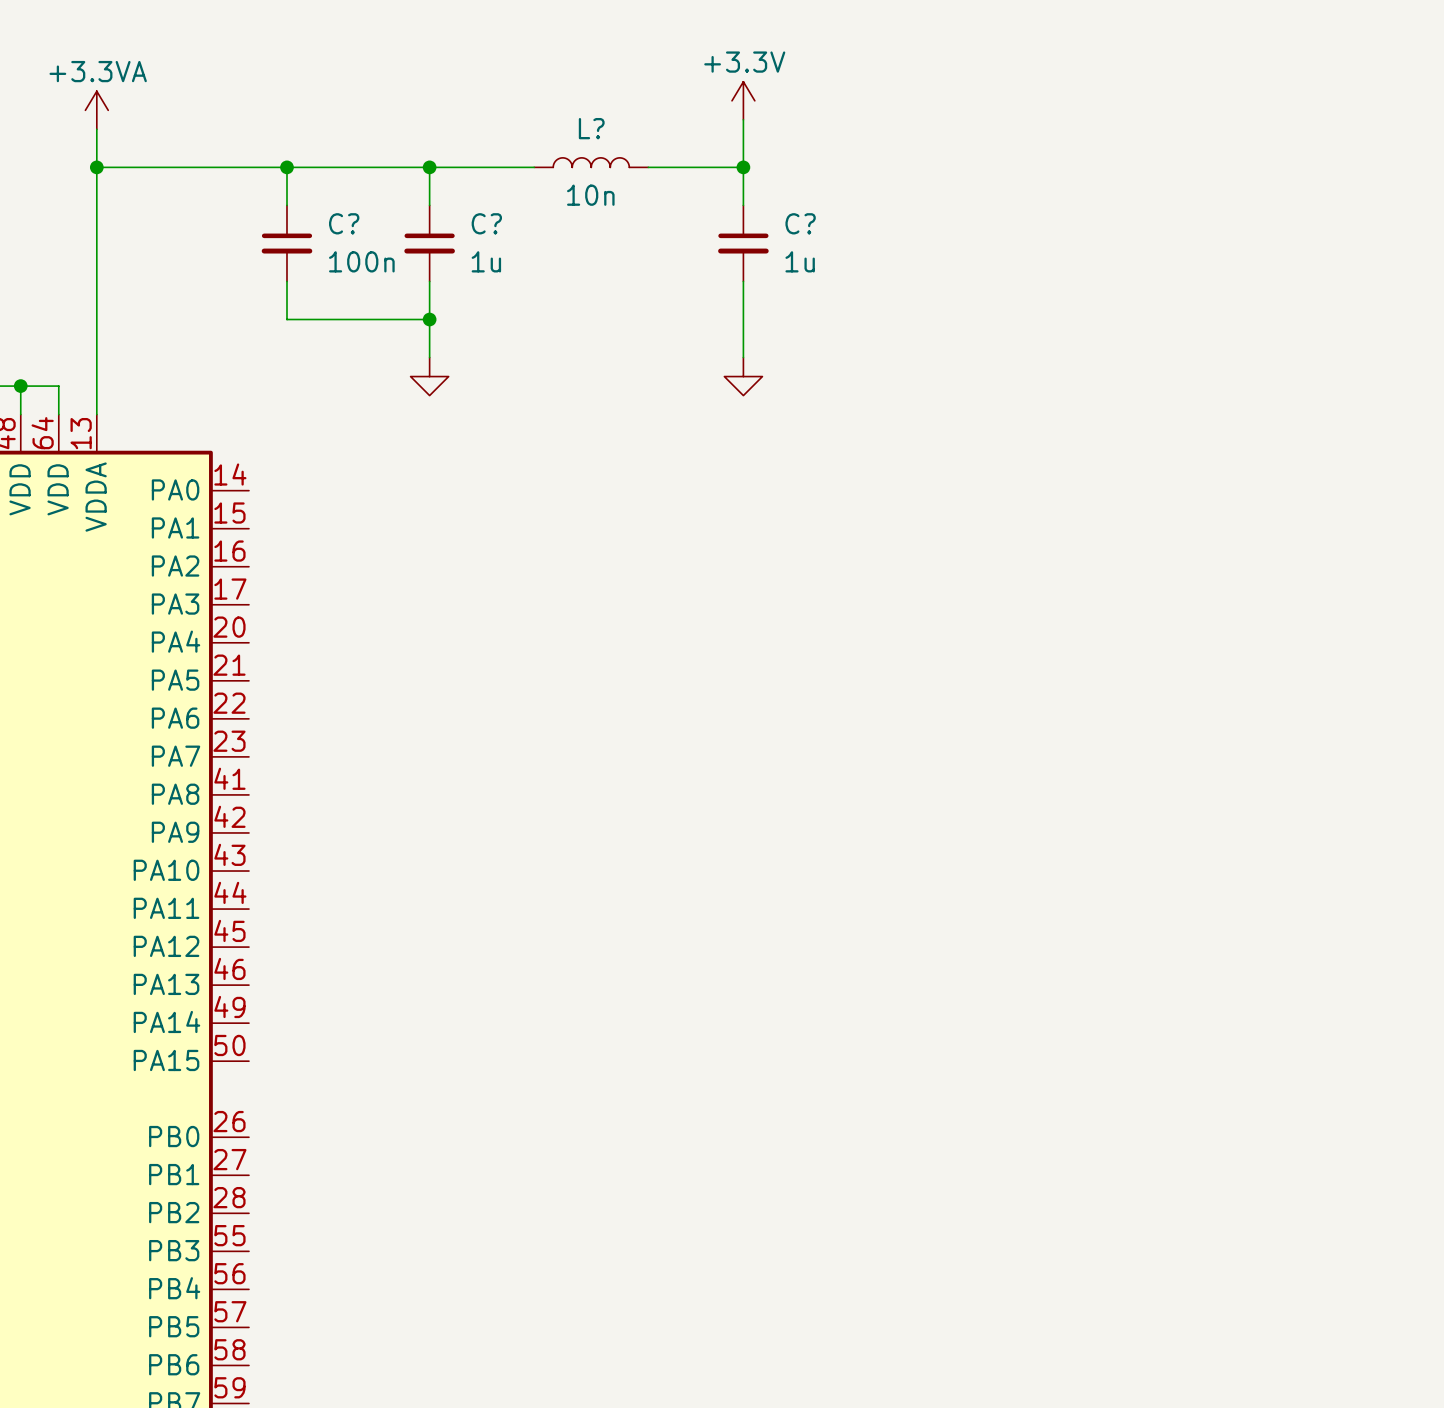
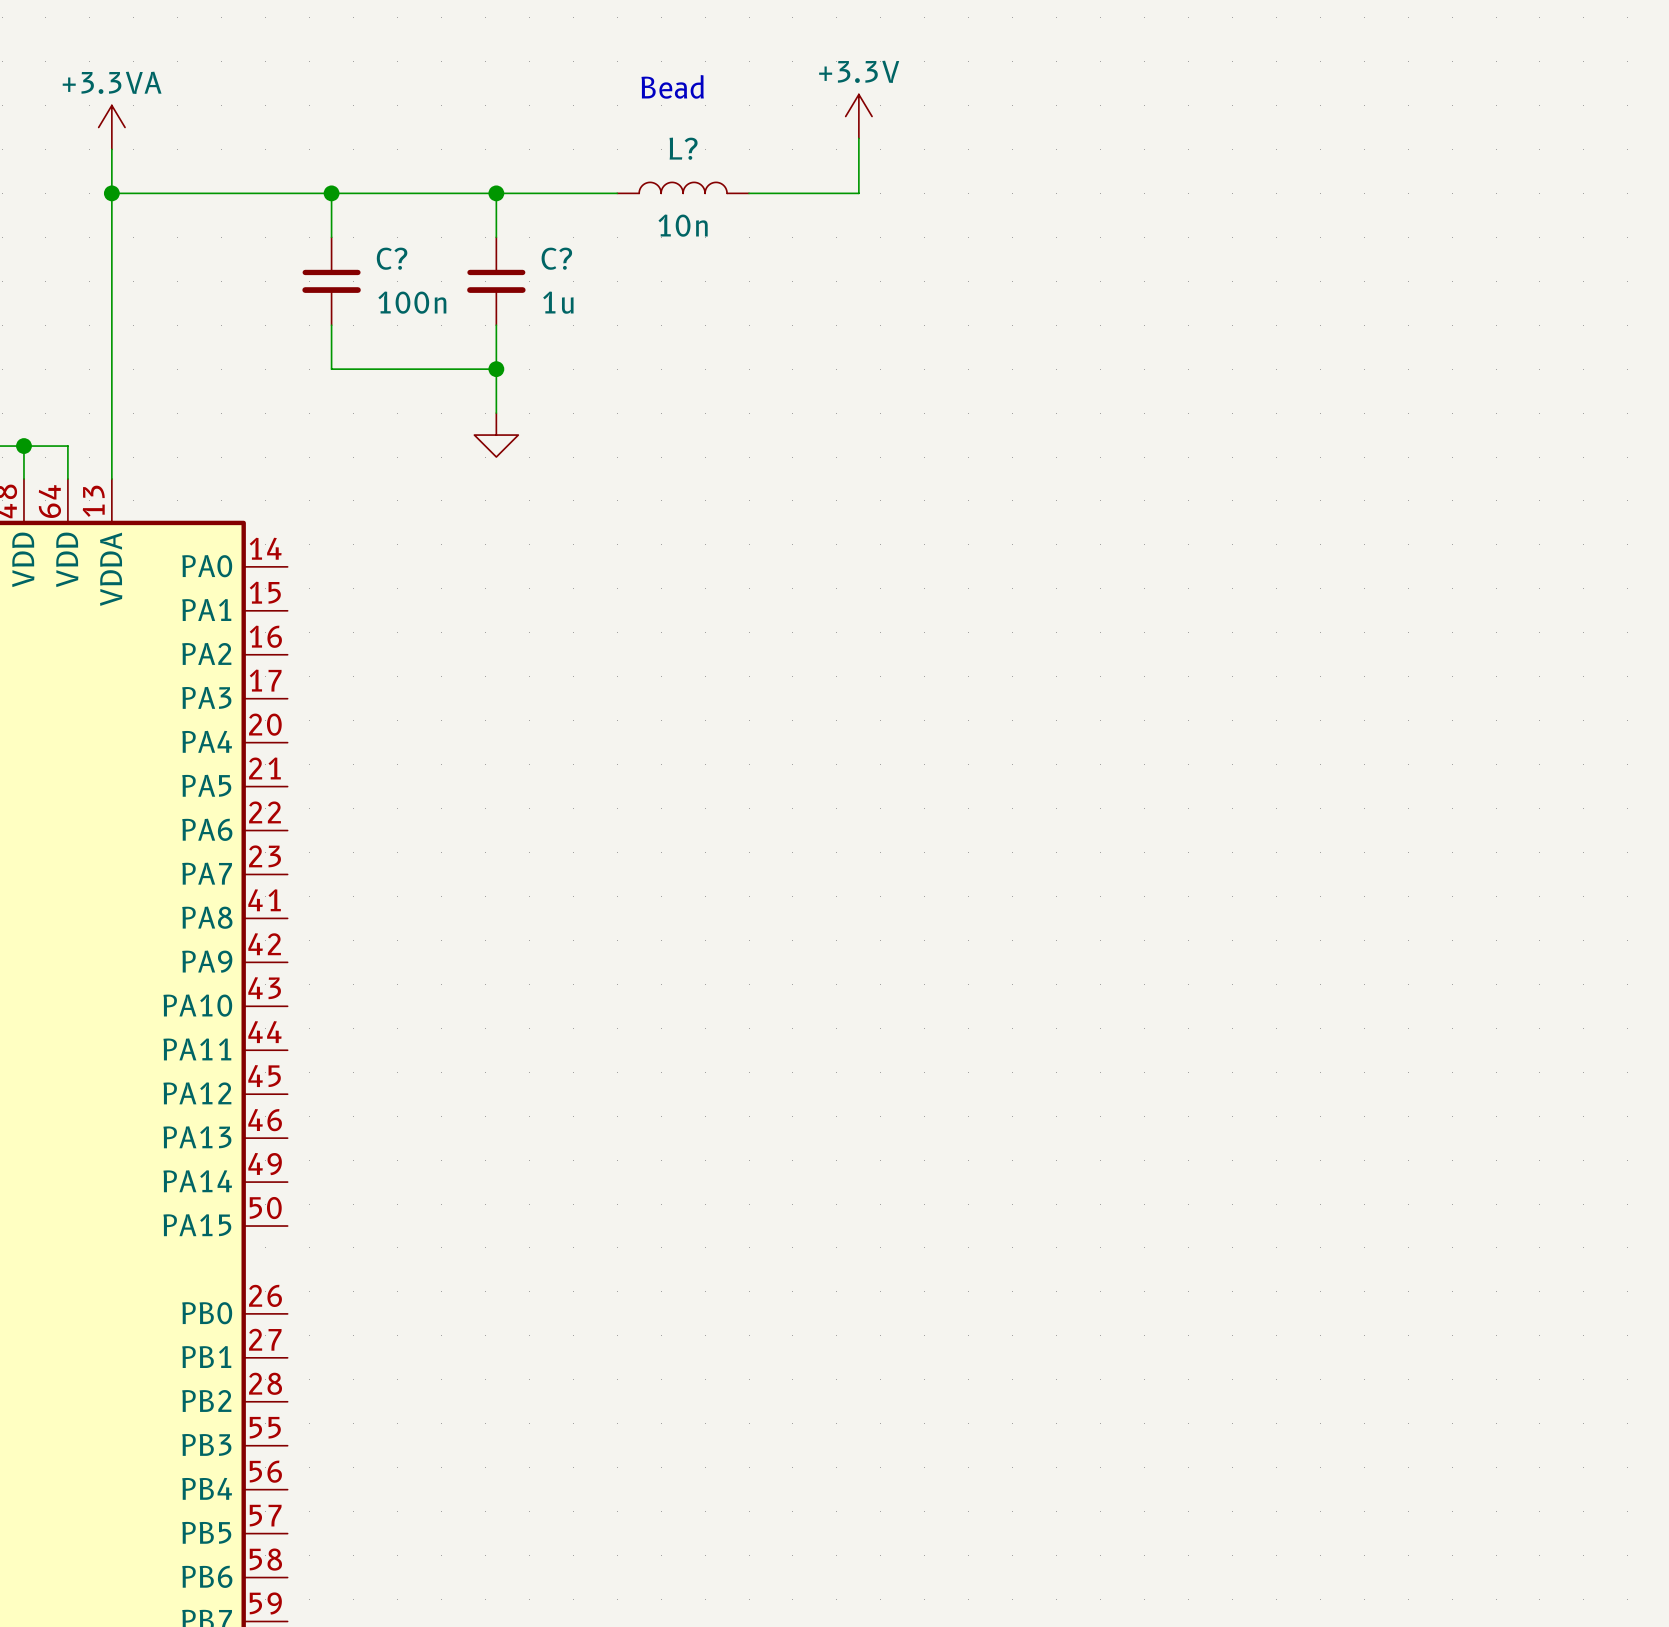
text: none -> Bead (672, 86)
wire: (743, 167) (743, 205) -> none
junction: (743, 167) -> none
C?: 1u (743, 243) -> none
wire: (743, 281) (743, 357) -> none
power symbol: (743, 376) -> none

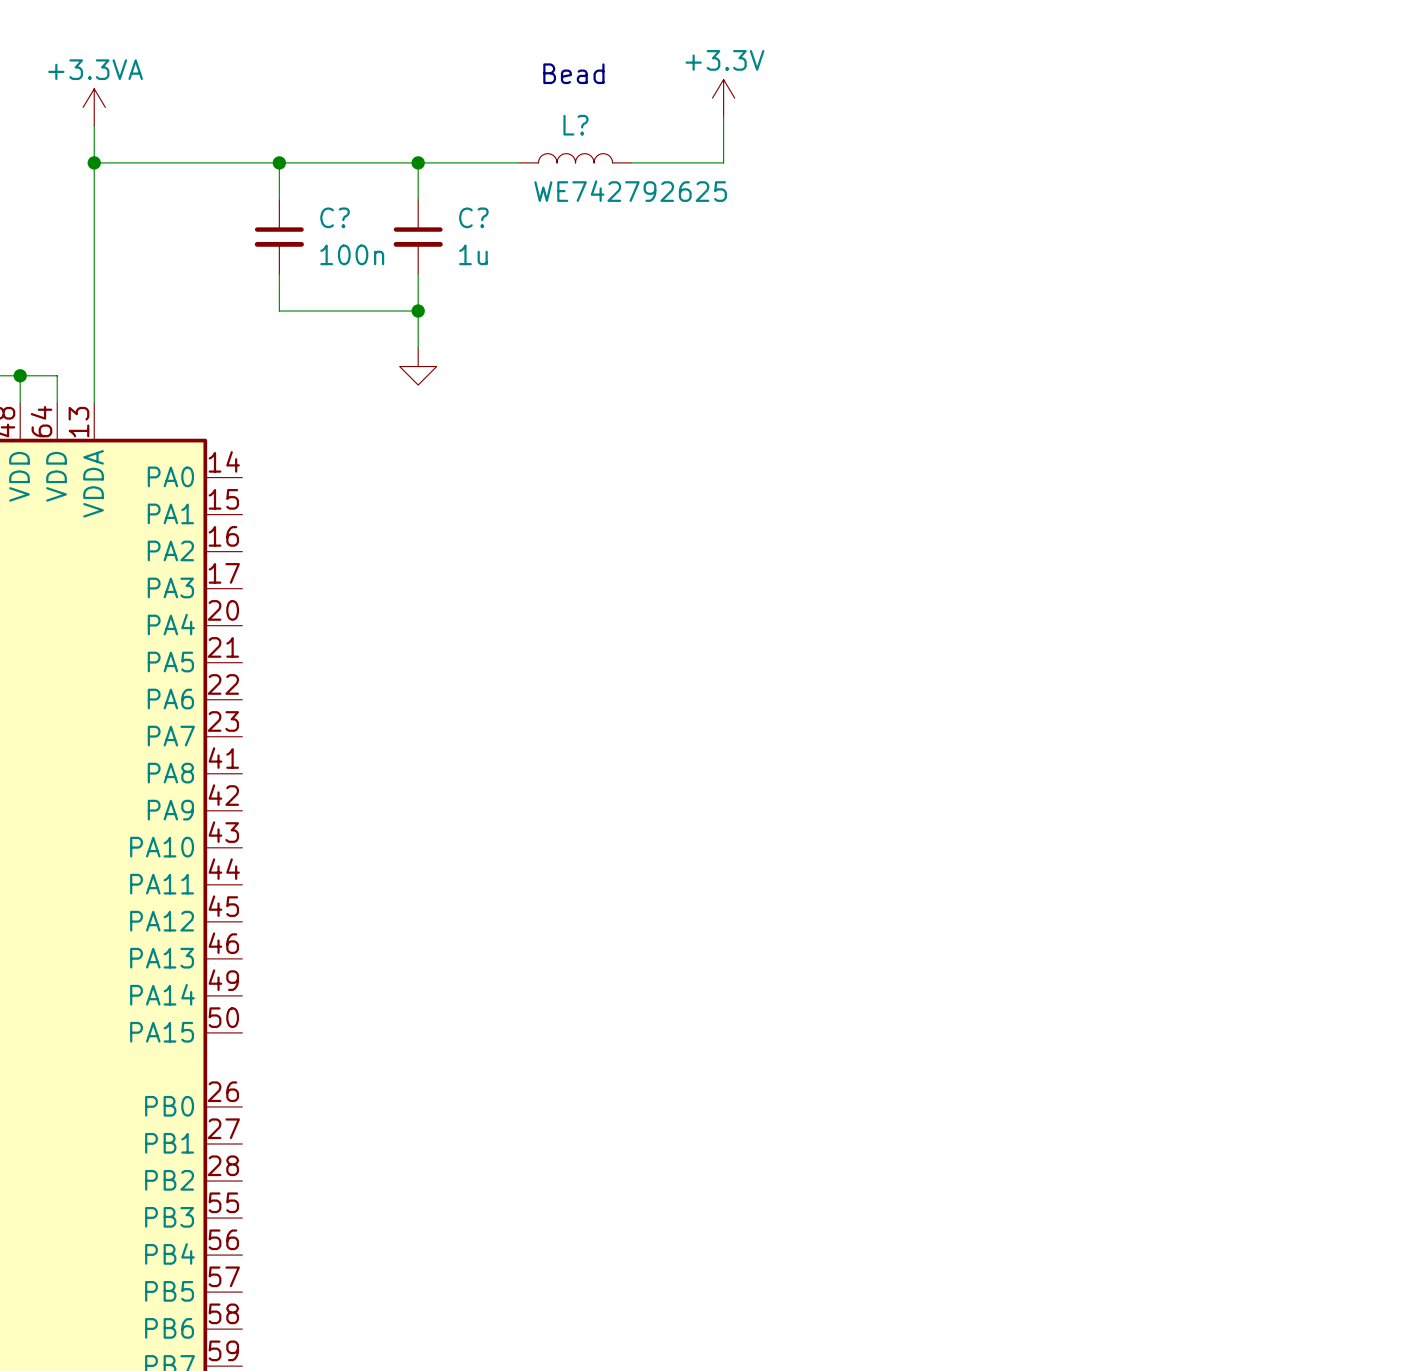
L? value: 10n (683, 225) -> WE742792625 (630, 191)

